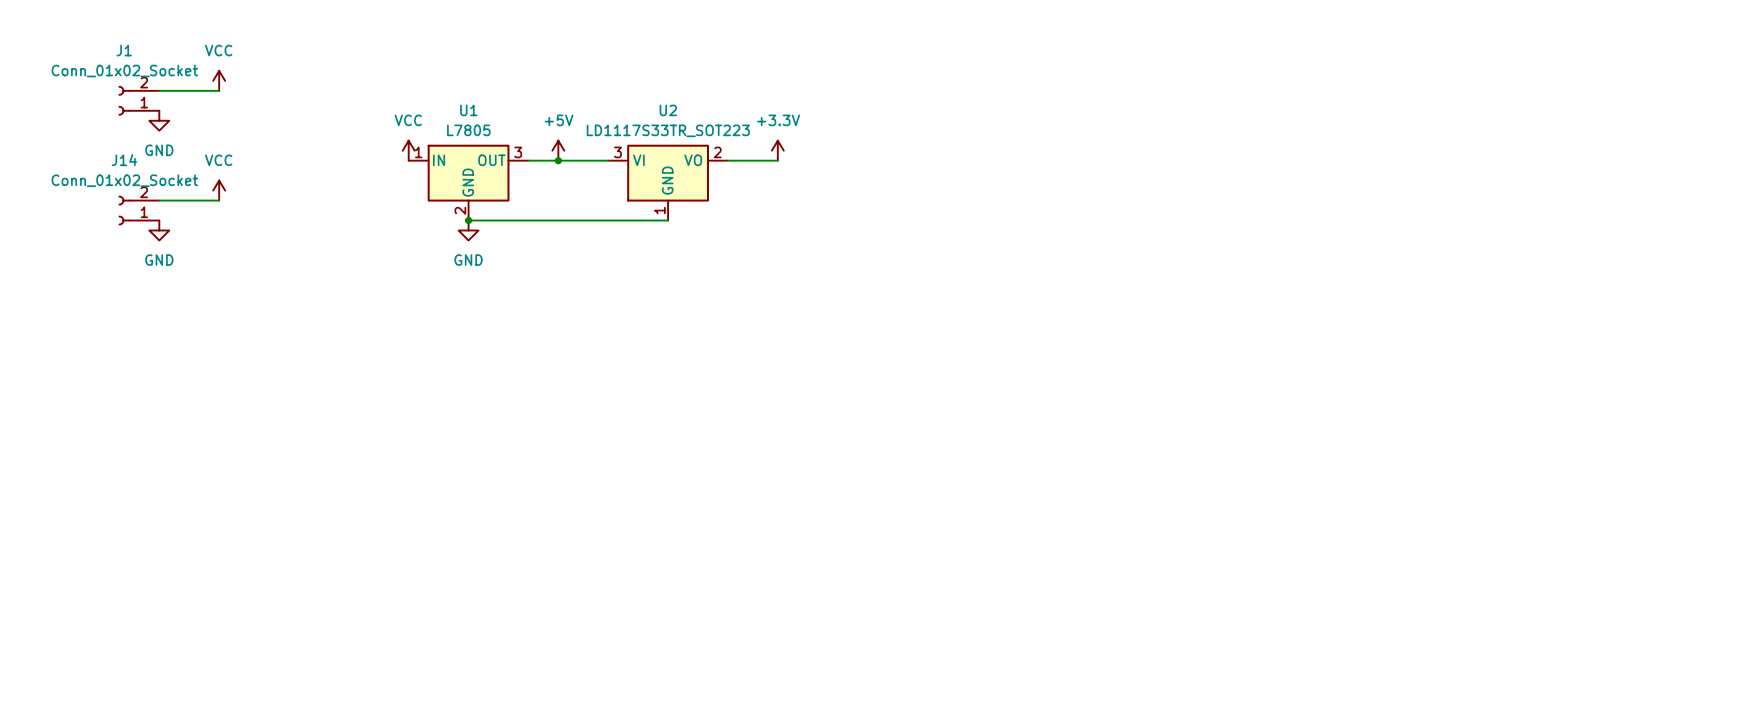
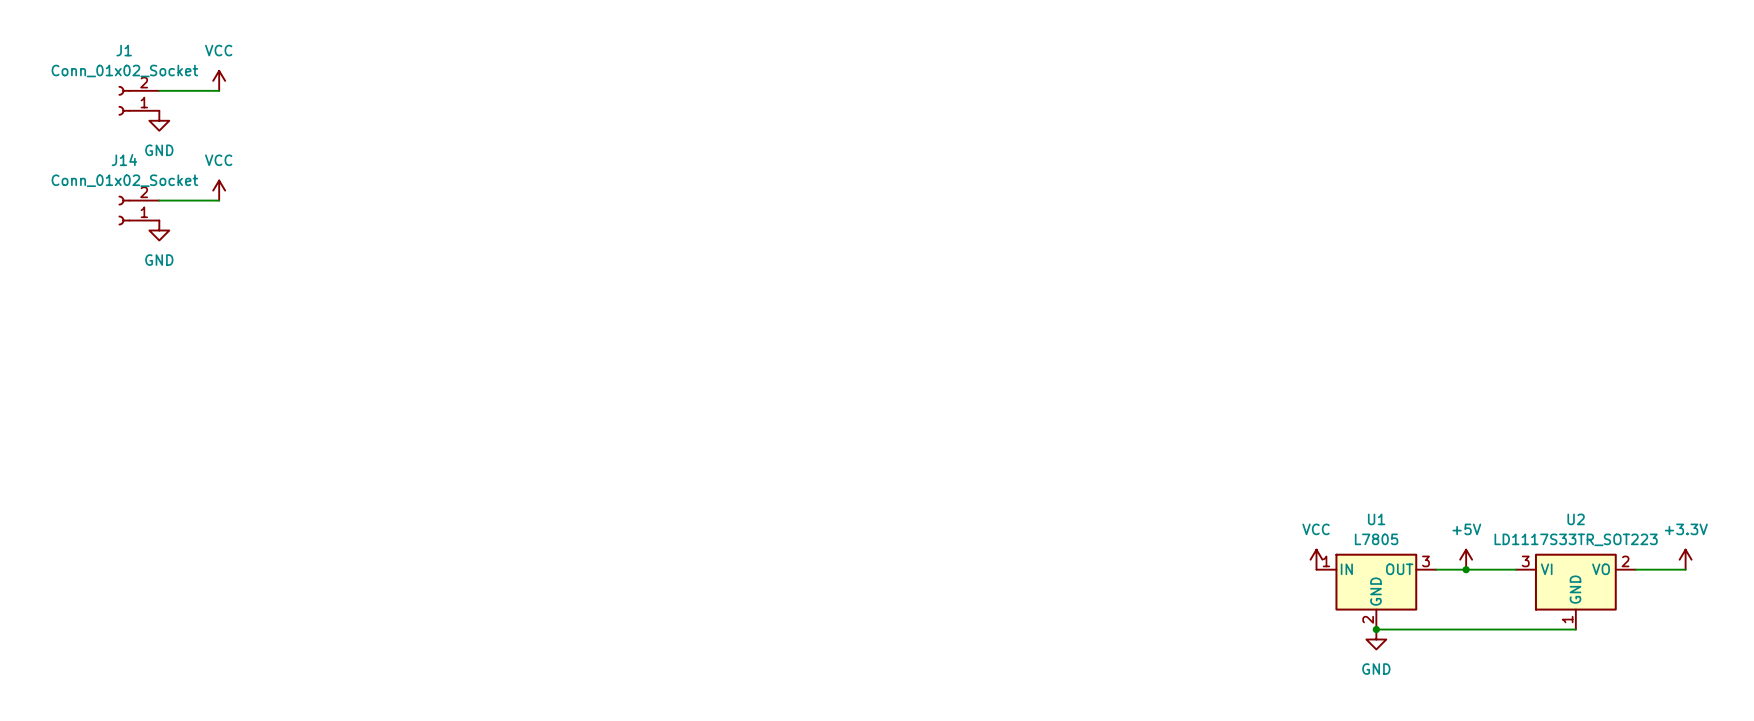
power symbol: VCC (408, 150) -> none
power symbol: +5V (558, 150) -> none
power symbol: +3.3V (777, 150) -> none
wire: (528, 160) (608, 160) -> none
junction: (558, 160) -> none
wire: (727, 160) (777, 160) -> none
U1 position: (468, 182) -> (1376, 591)
U2 position: (668, 182) -> (1575, 591)
wire: (468, 220) (668, 220) -> none
junction: (468, 220) -> none
power symbol: GND (468, 230) -> none
power symbol: none -> VCC (1316, 559)
power symbol: none -> +5V (1466, 559)
power symbol: none -> +3.3V (1685, 559)
wire: none -> (1436, 569) (1516, 569)
junction: none -> (1466, 569)
wire: none -> (1635, 569) (1685, 569)
wire: none -> (1376, 629) (1575, 629)
junction: none -> (1376, 629)
power symbol: none -> GND (1376, 639)

